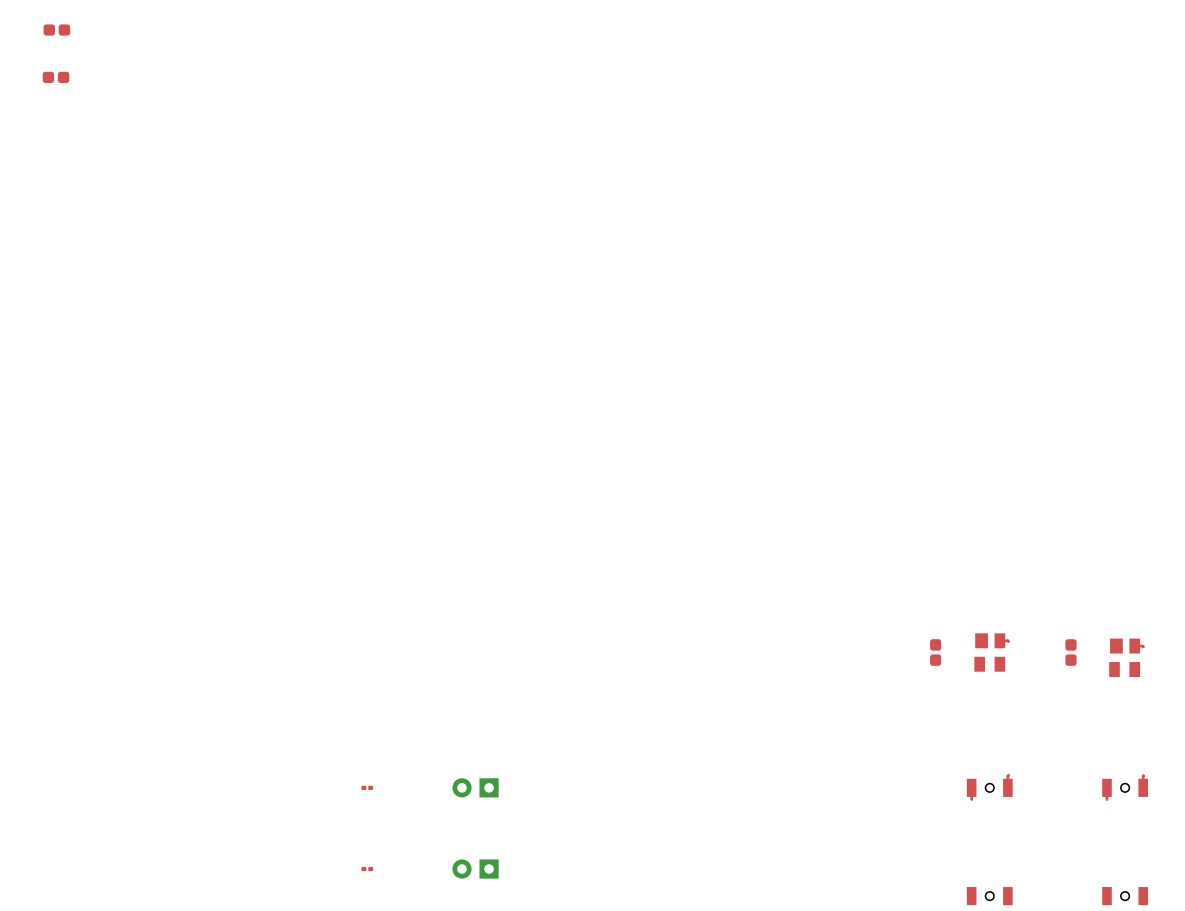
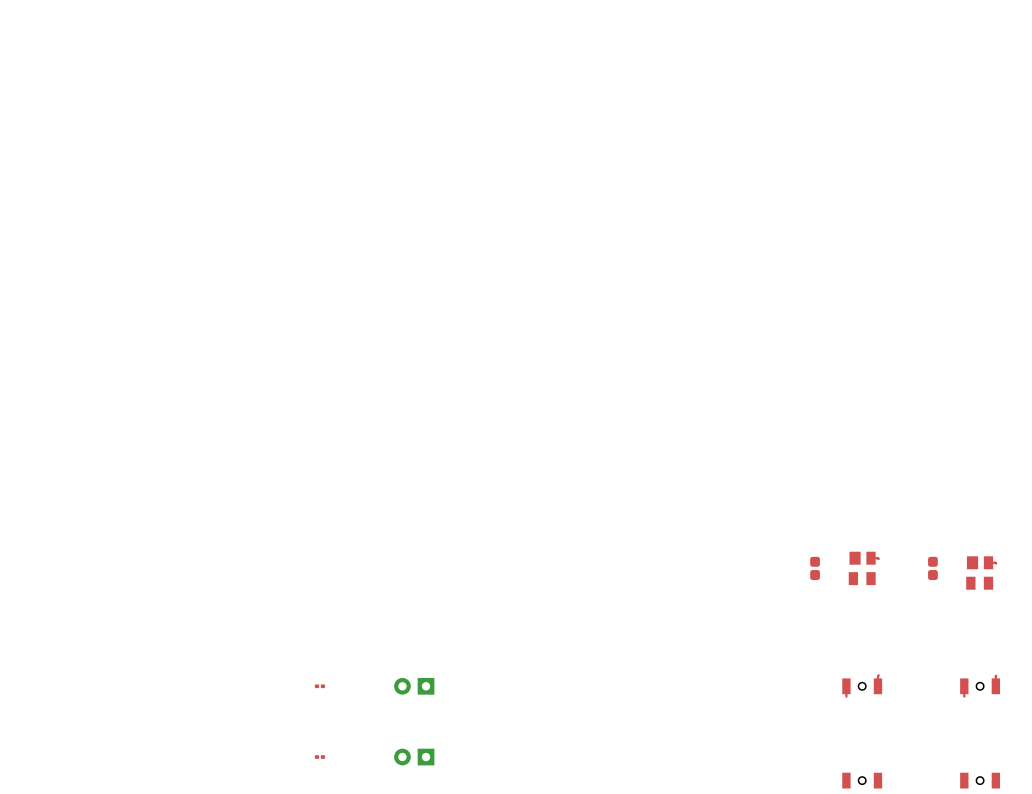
part: (56, 30) -> none
part: (56, 77) -> none

